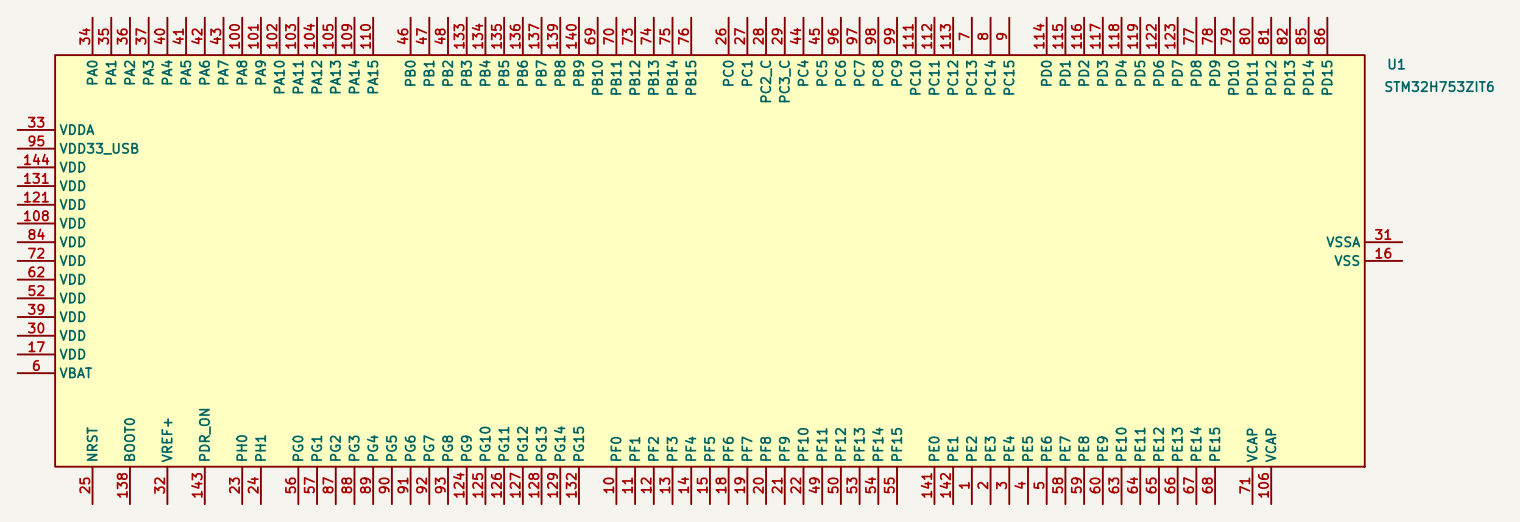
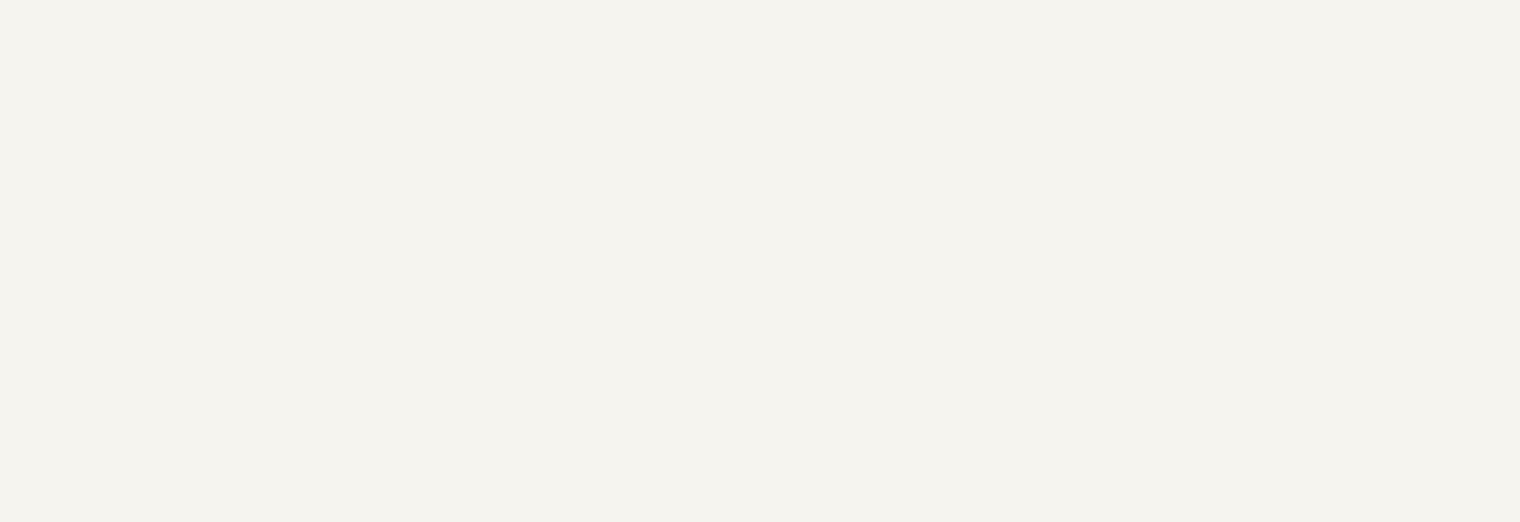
U1: STM32H753ZIT6 (709, 260) -> none

